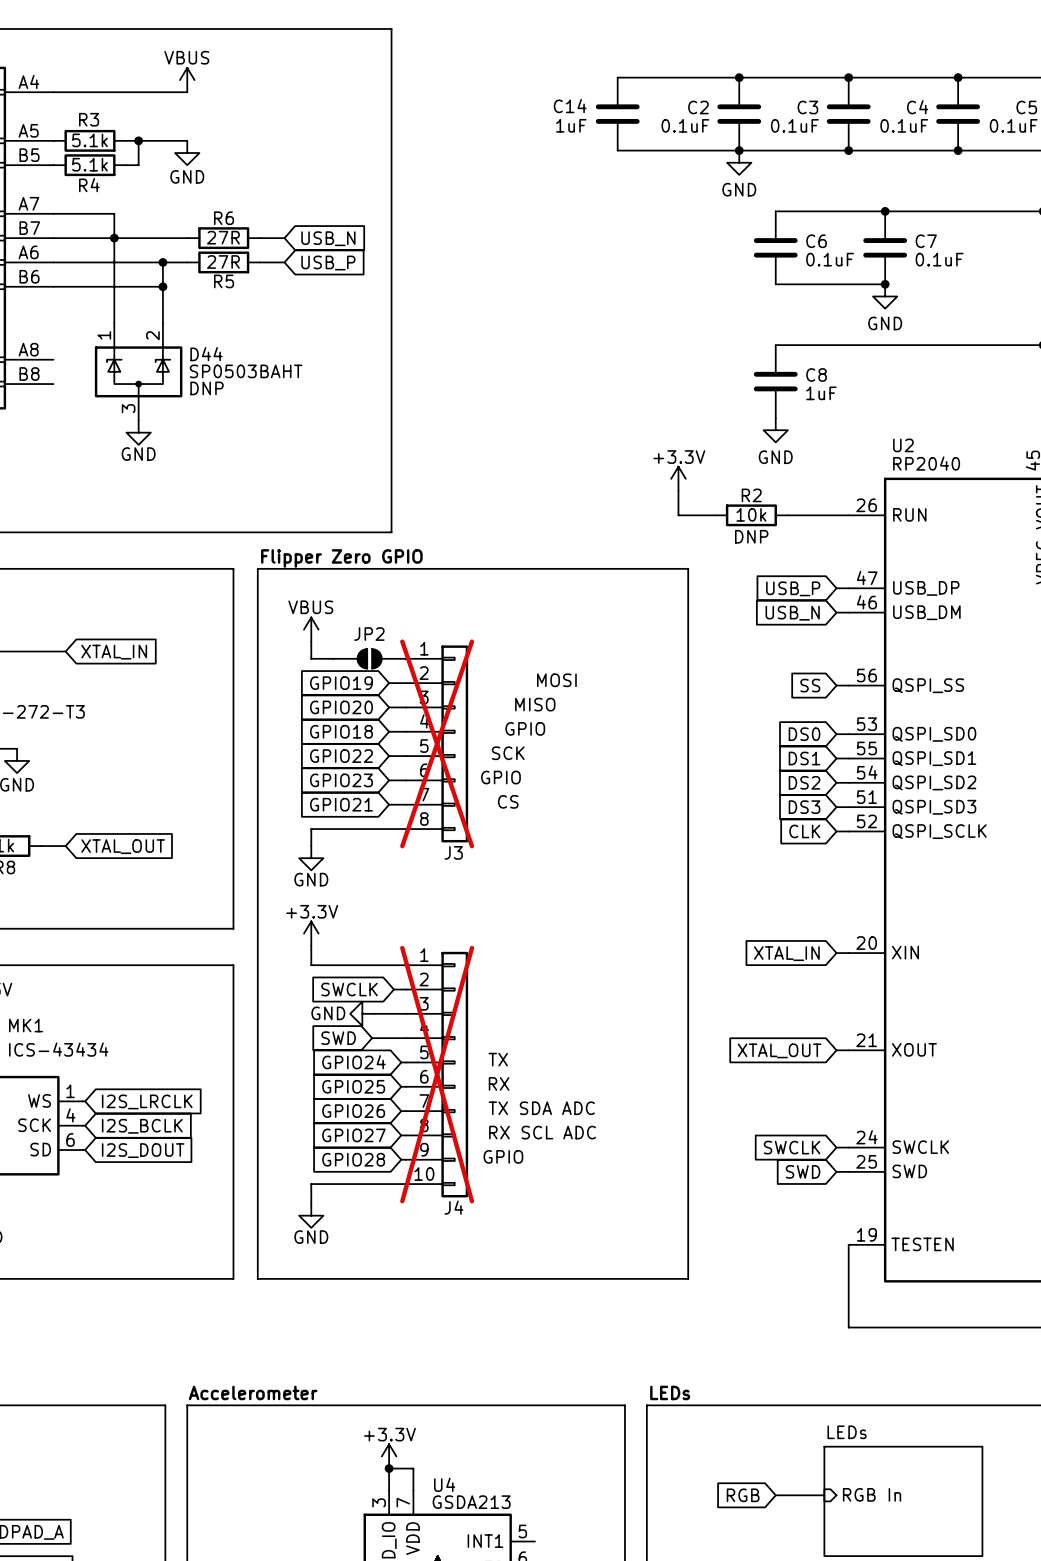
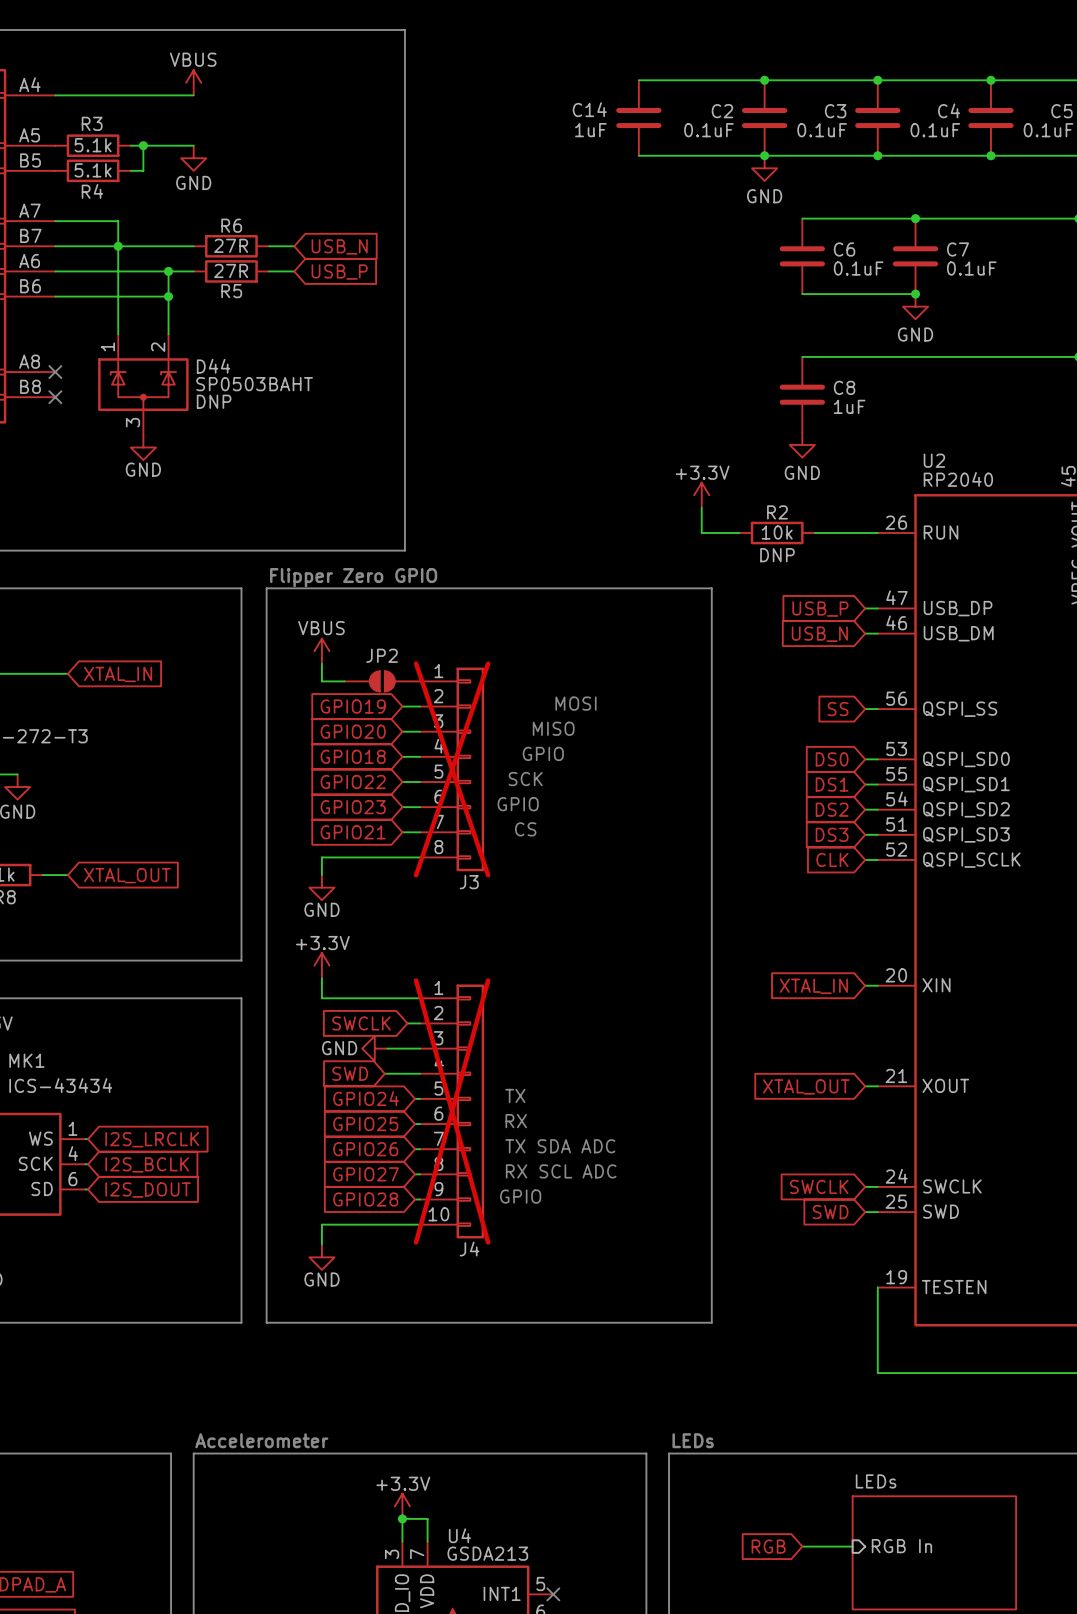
no-connect mark: none -> (55, 372)
no-connect mark: none -> (55, 397)
no-connect mark: none -> (553, 1594)

